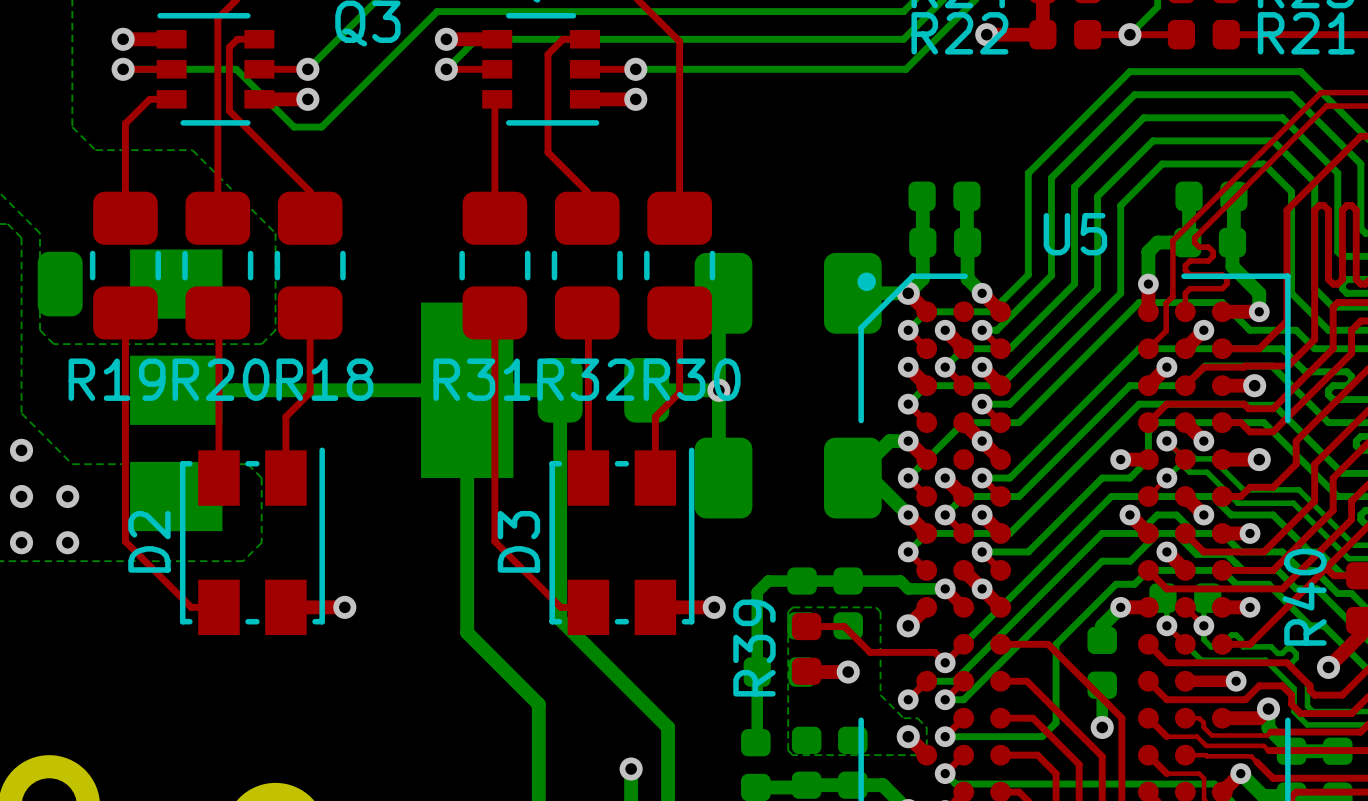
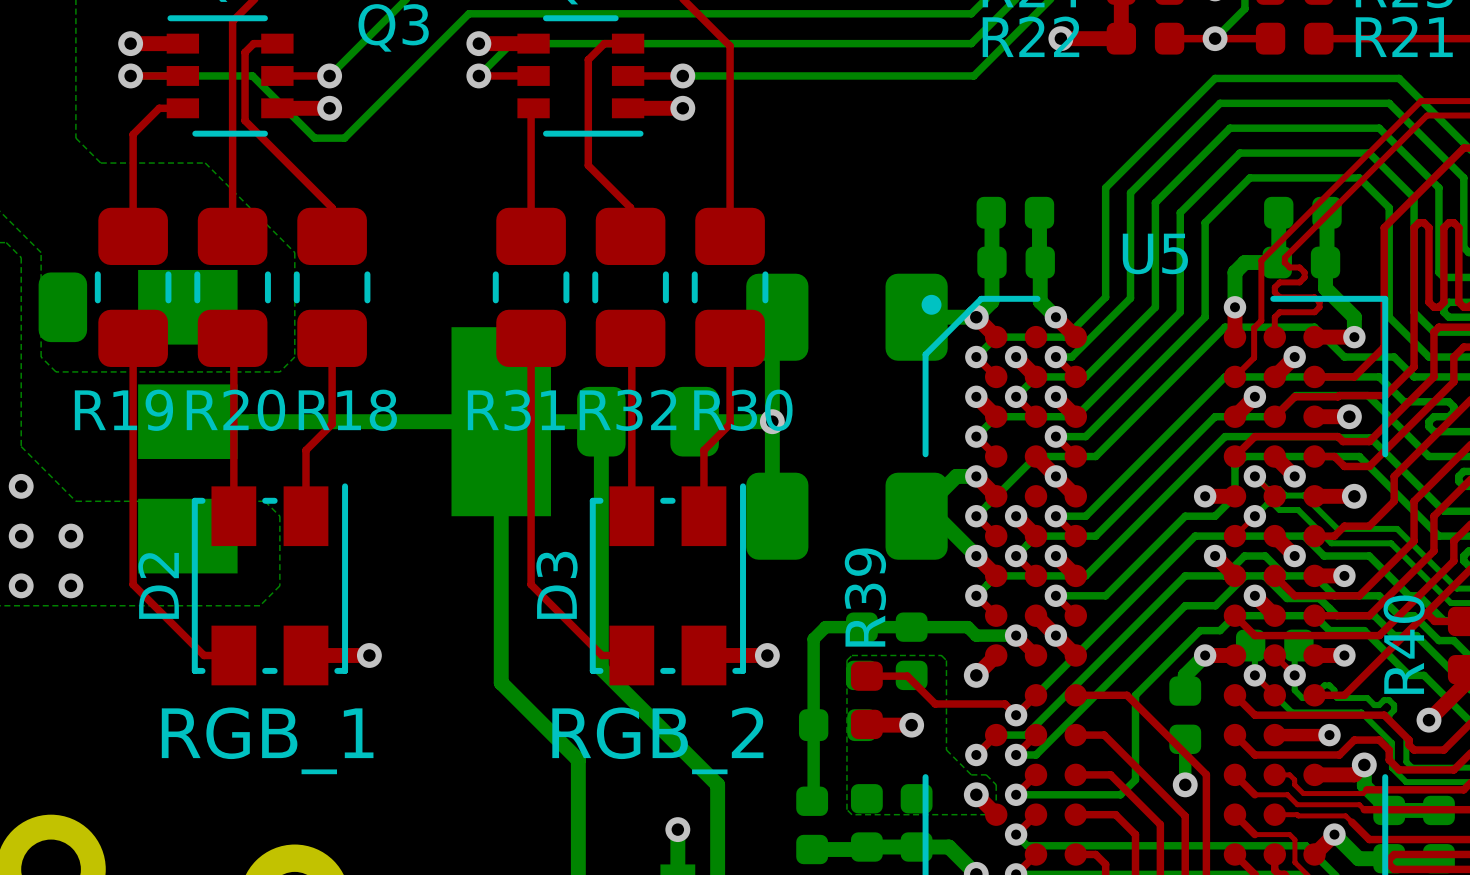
R39 name position: R39 (754, 648) -> R39 (865, 597)
text: none -> RGB_1 (267, 740)
text: none -> RGB_2 (657, 740)

